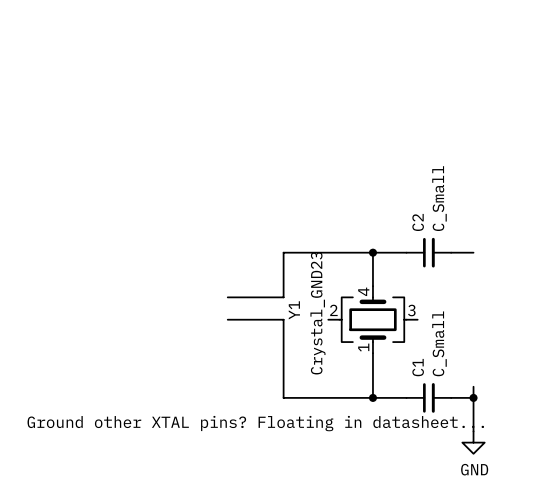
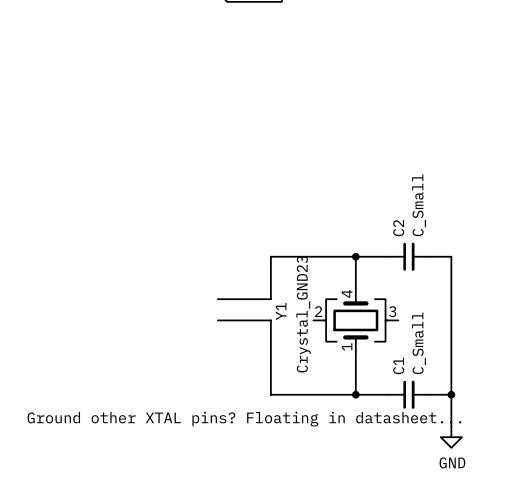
wire: none -> (451, 256) (451, 384)

